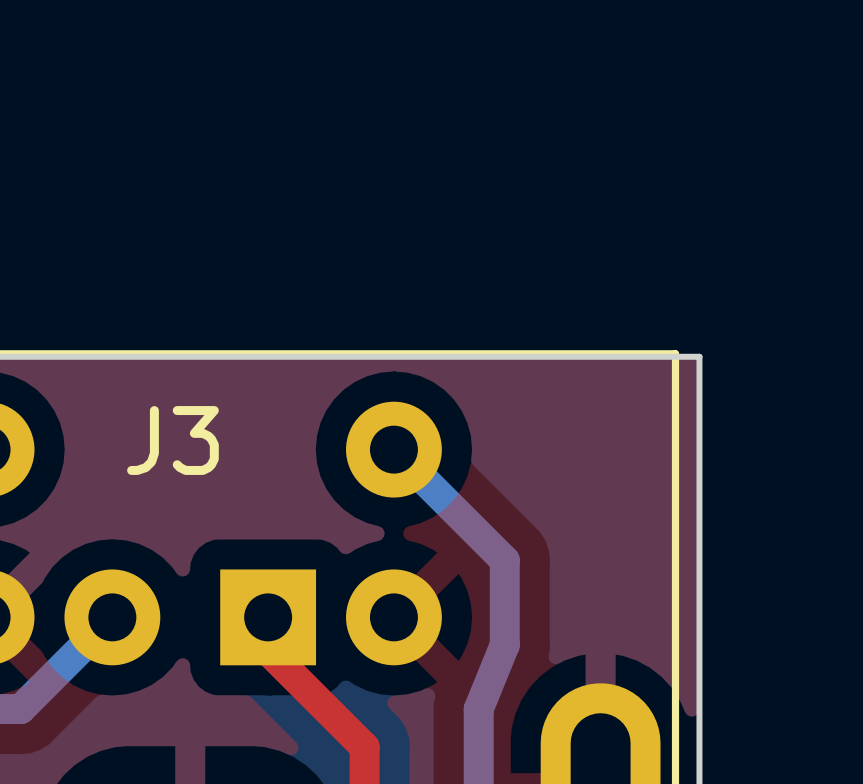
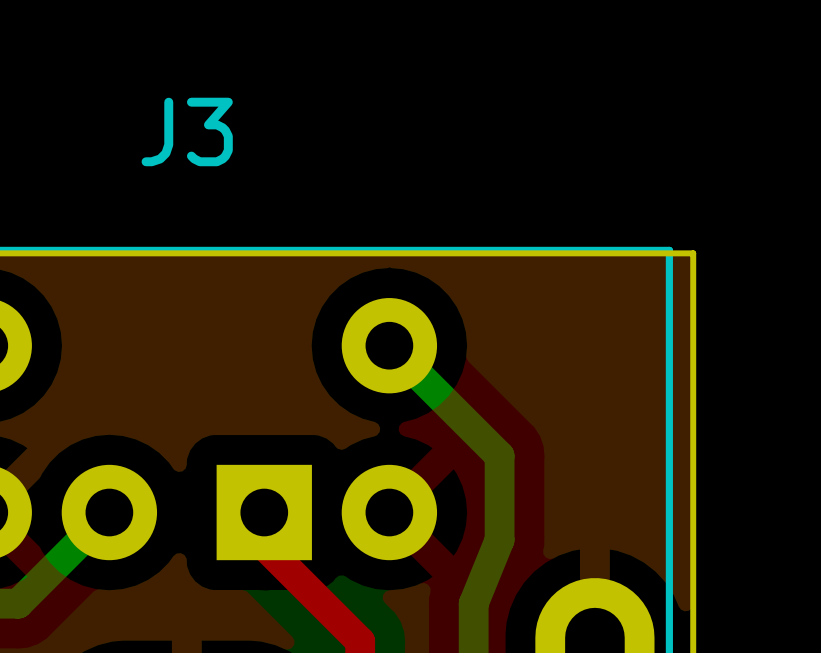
J3 name position: J3 (172, 440) -> J3 (187, 131)

